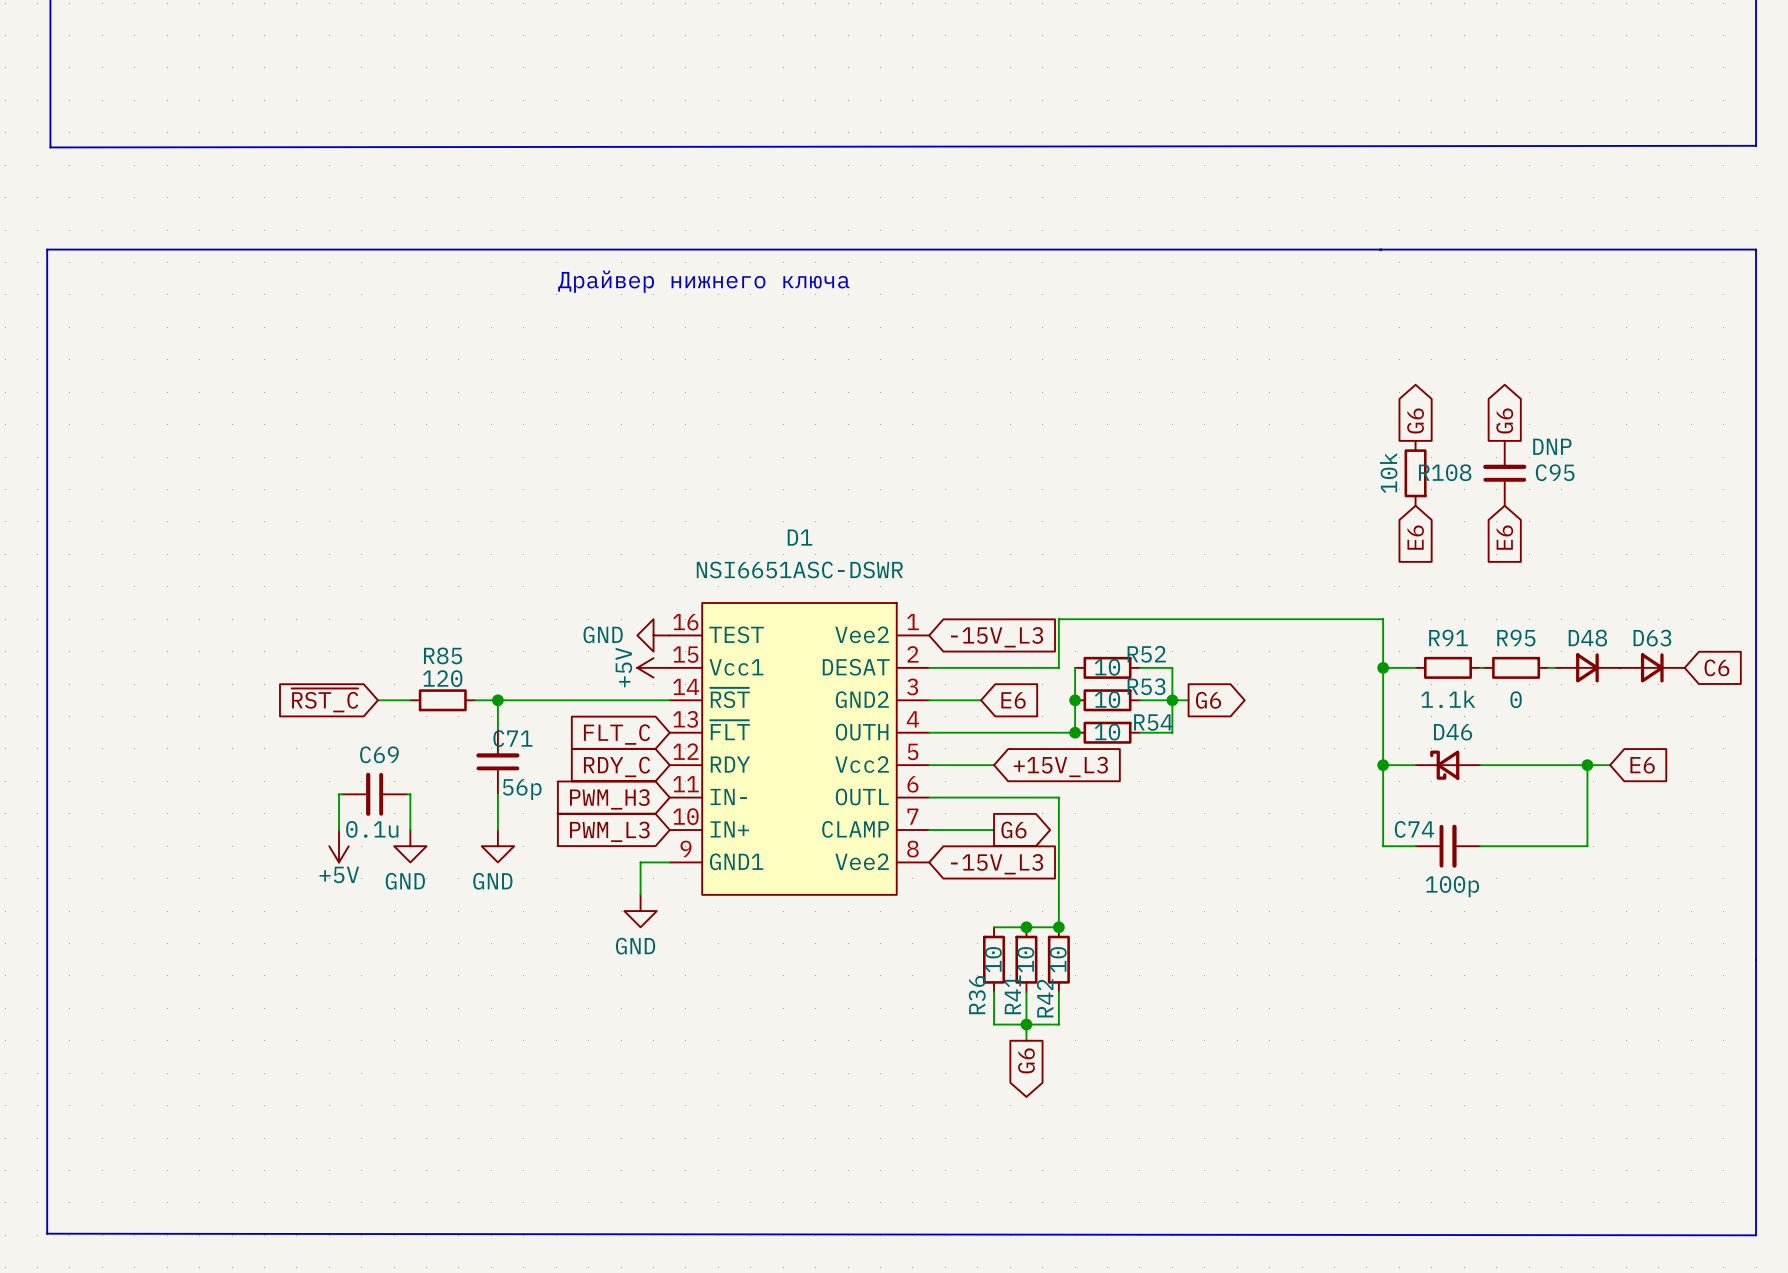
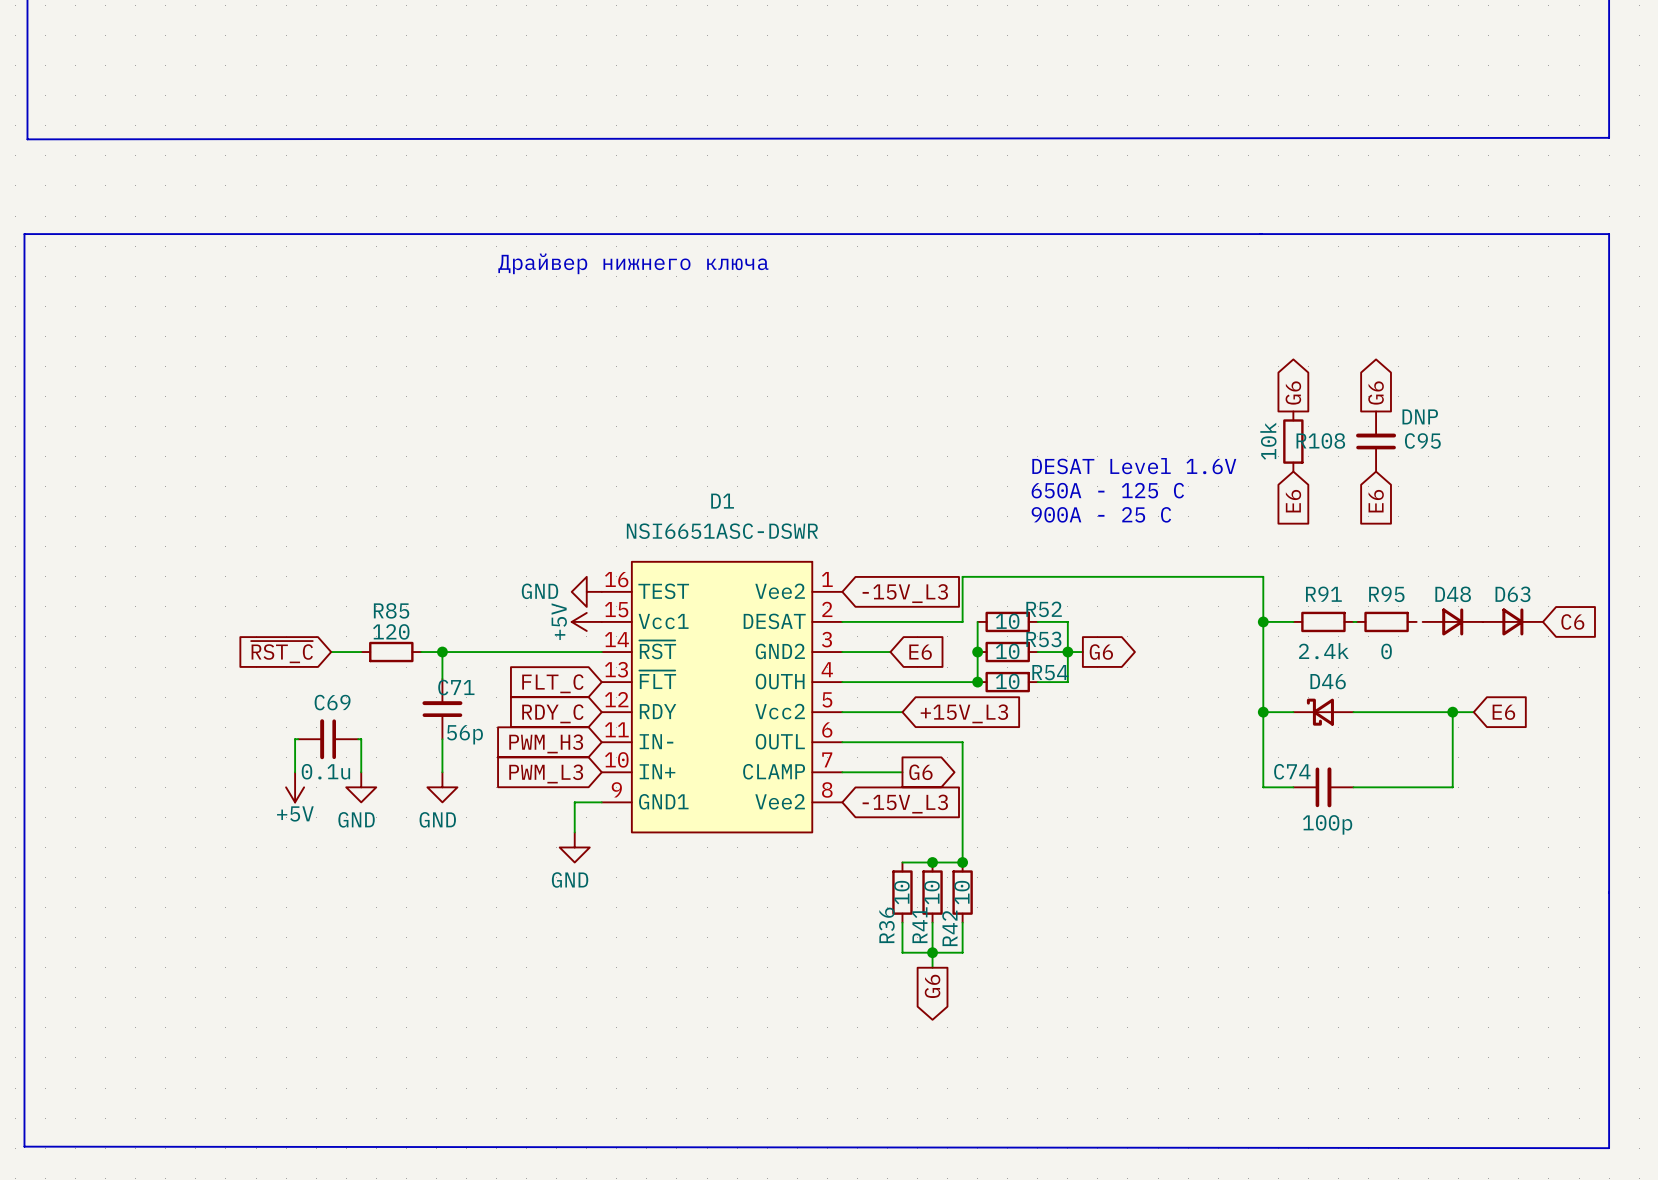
text: none -> DESAT Level 1.6V (1134, 466)
text: none -> 650A - 125 C (1107, 490)
text: none -> 900A - 25 C (1101, 514)
wire: (1548, 667) (1554, 667) -> none
R91 value: 1.1k (1448, 699) -> 2.4k (1323, 651)

